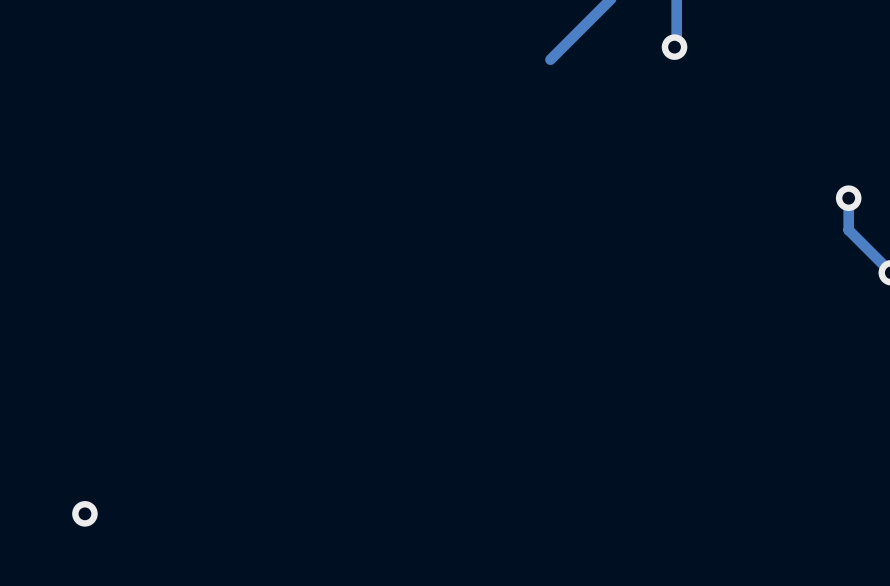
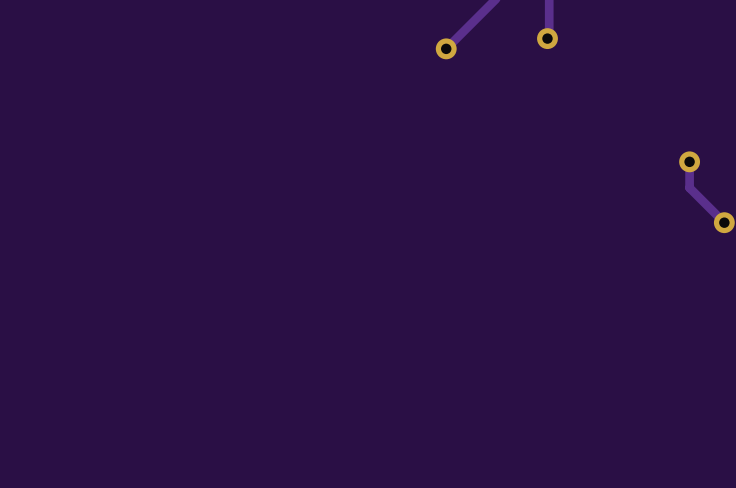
via: none -> (446, 48)
via: (84, 513) -> none

